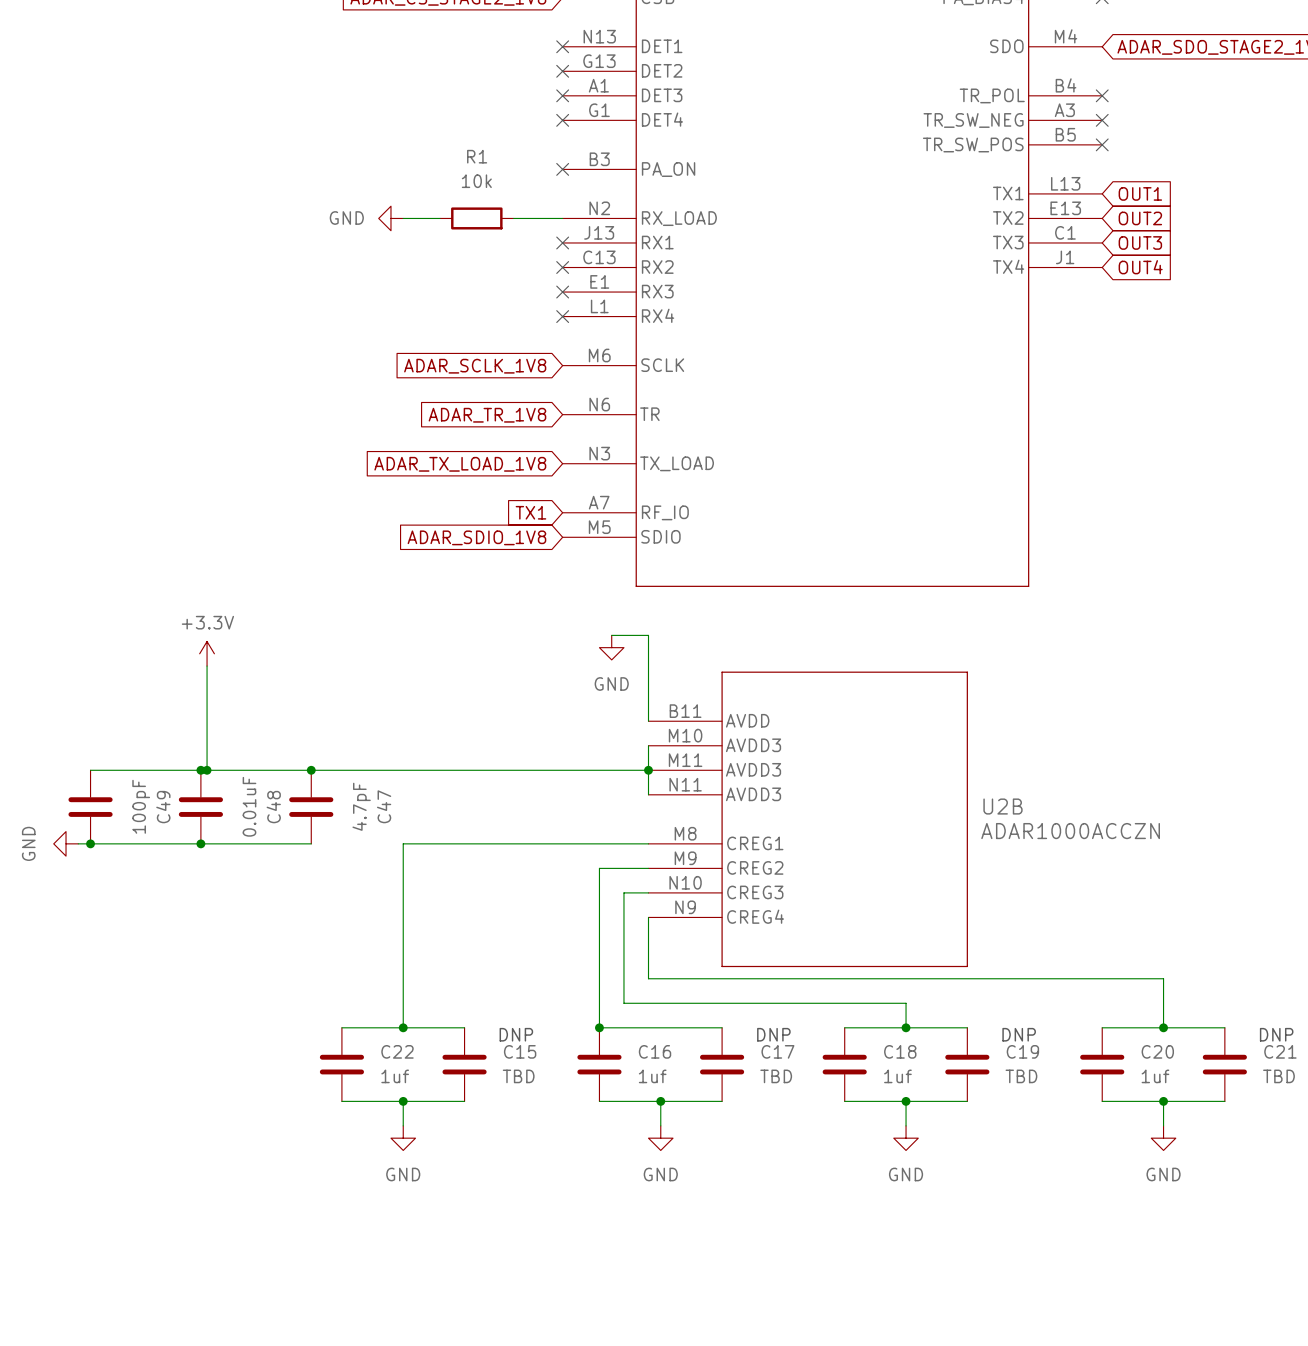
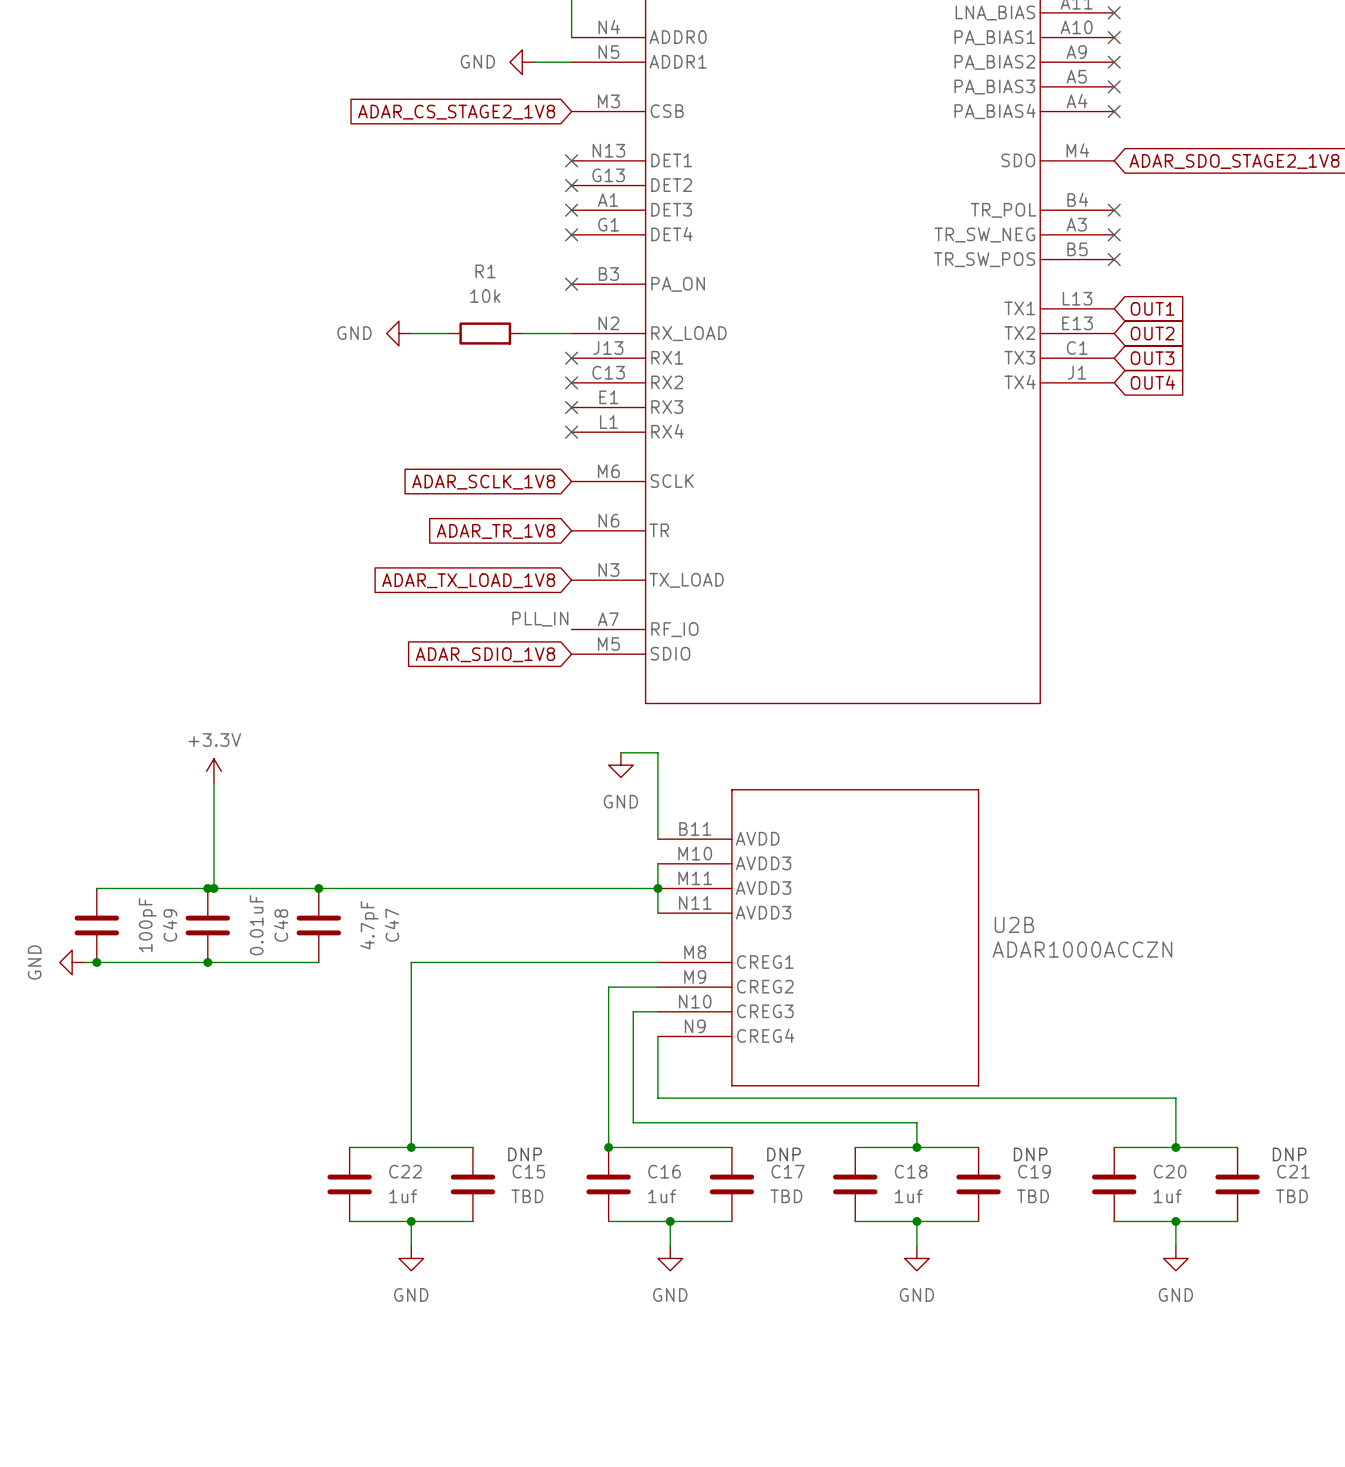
label: none -> PLL_IN (540, 619)
global label: TX1 (530, 512) -> none

